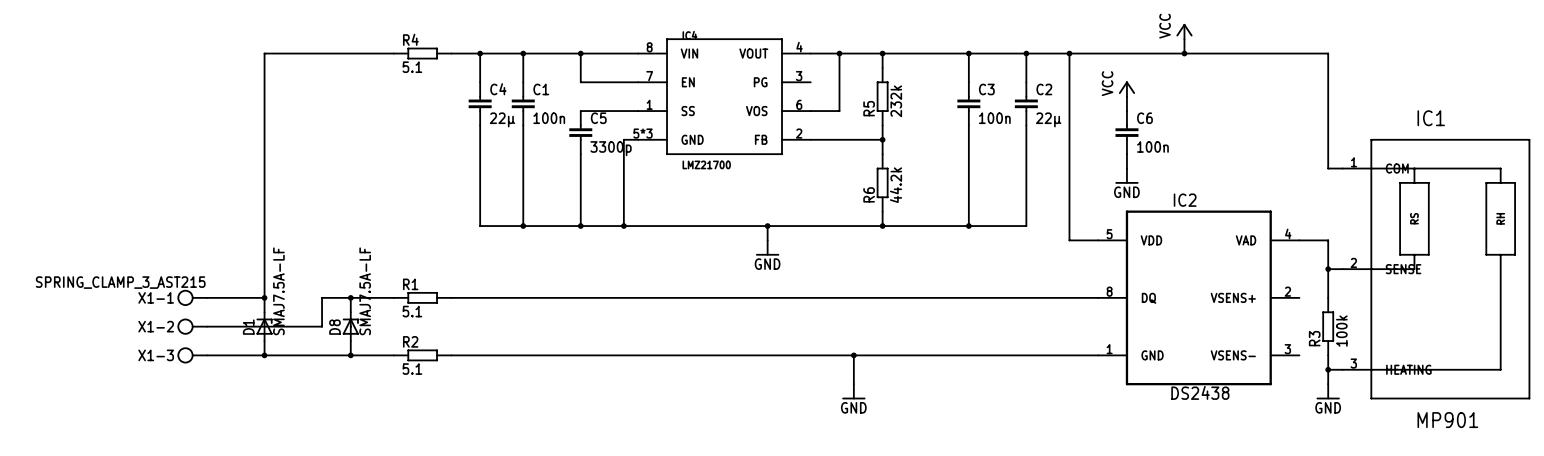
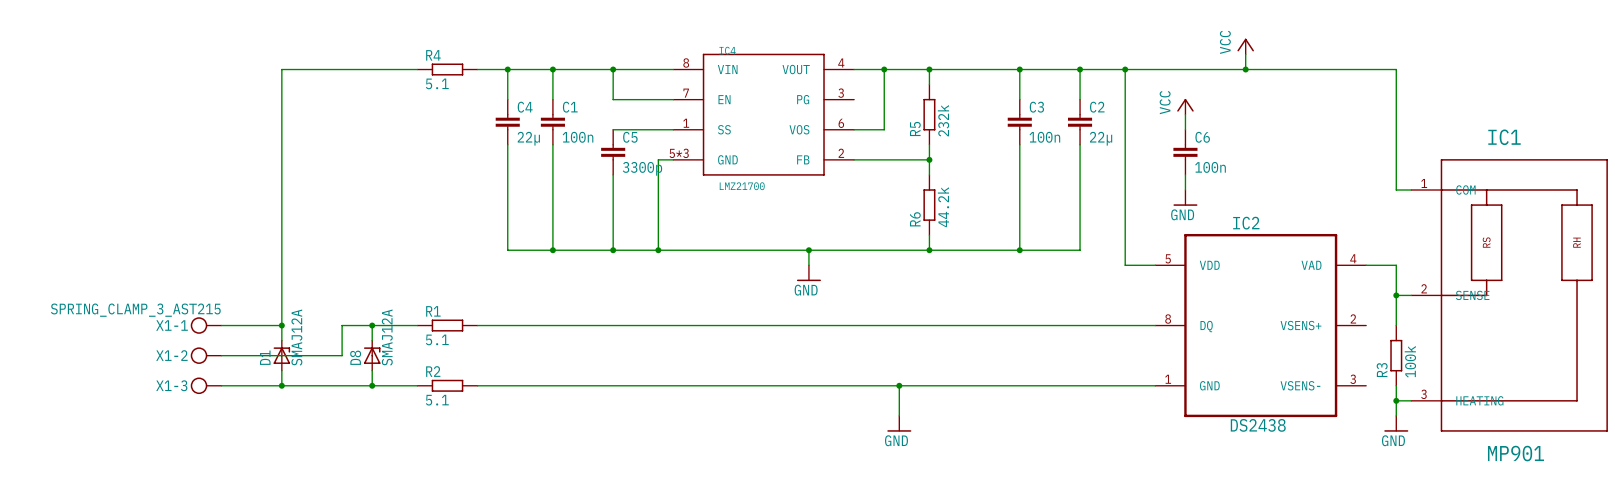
D1 value: SMAJ7.5A-LF (278, 291) -> SMAJ12A (296, 337)
D8 value: SMAJ7.5A-LF (365, 291) -> SMAJ12A (387, 337)

